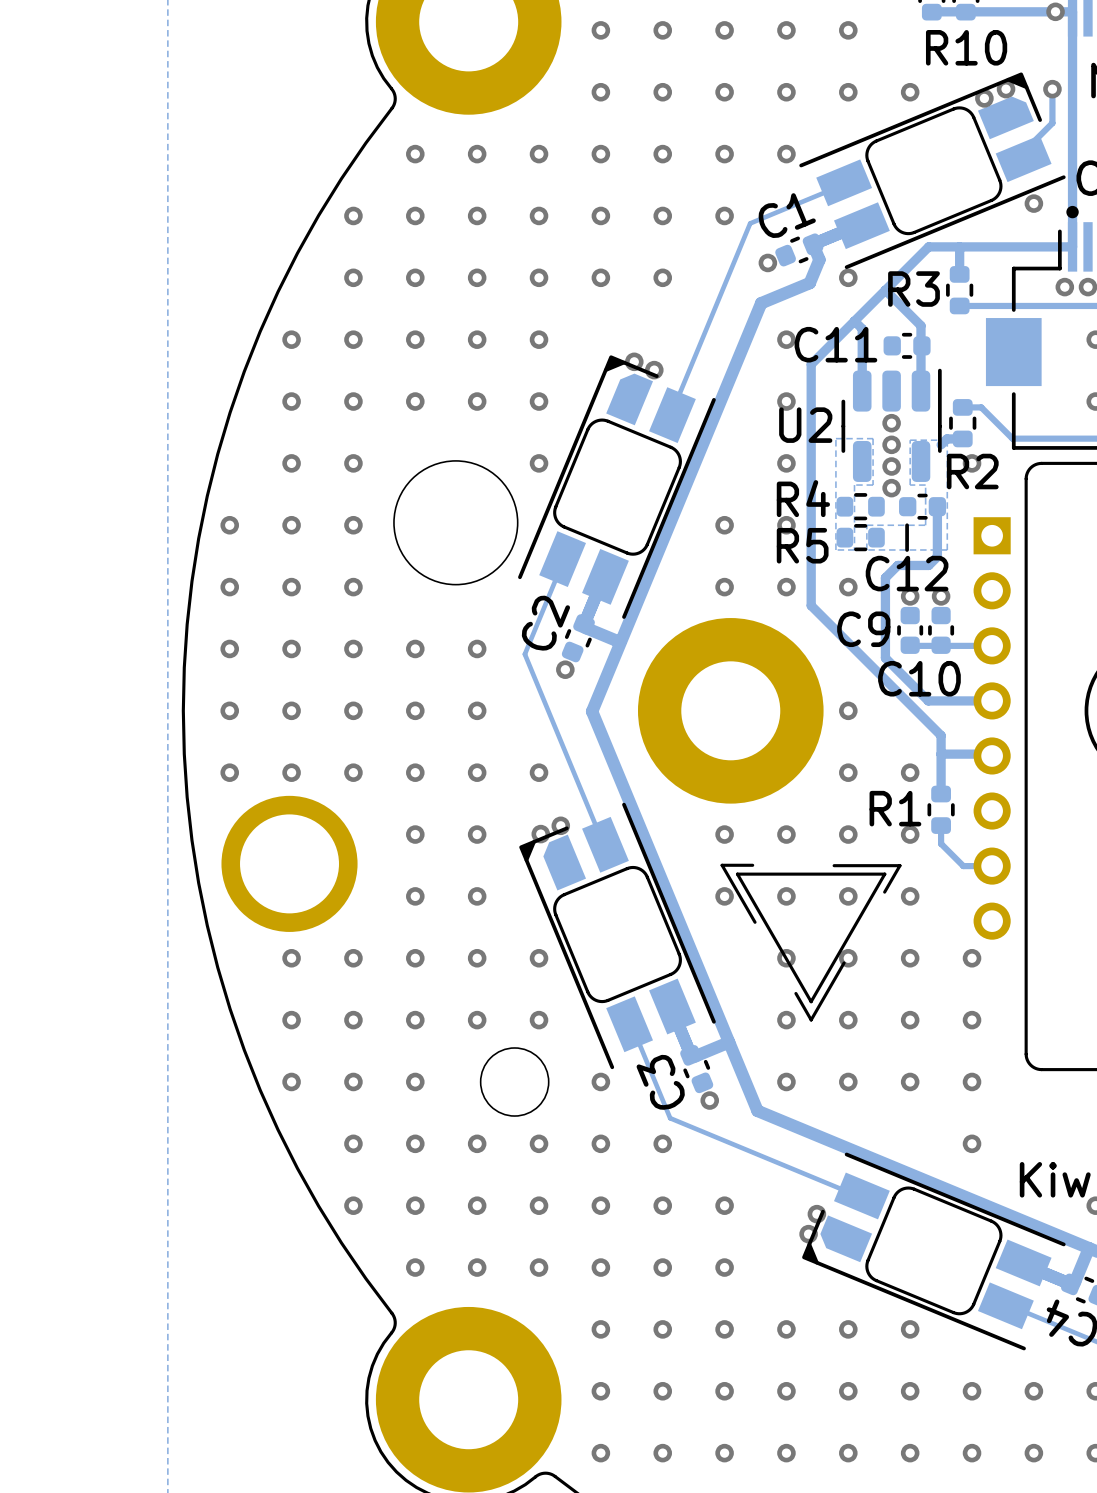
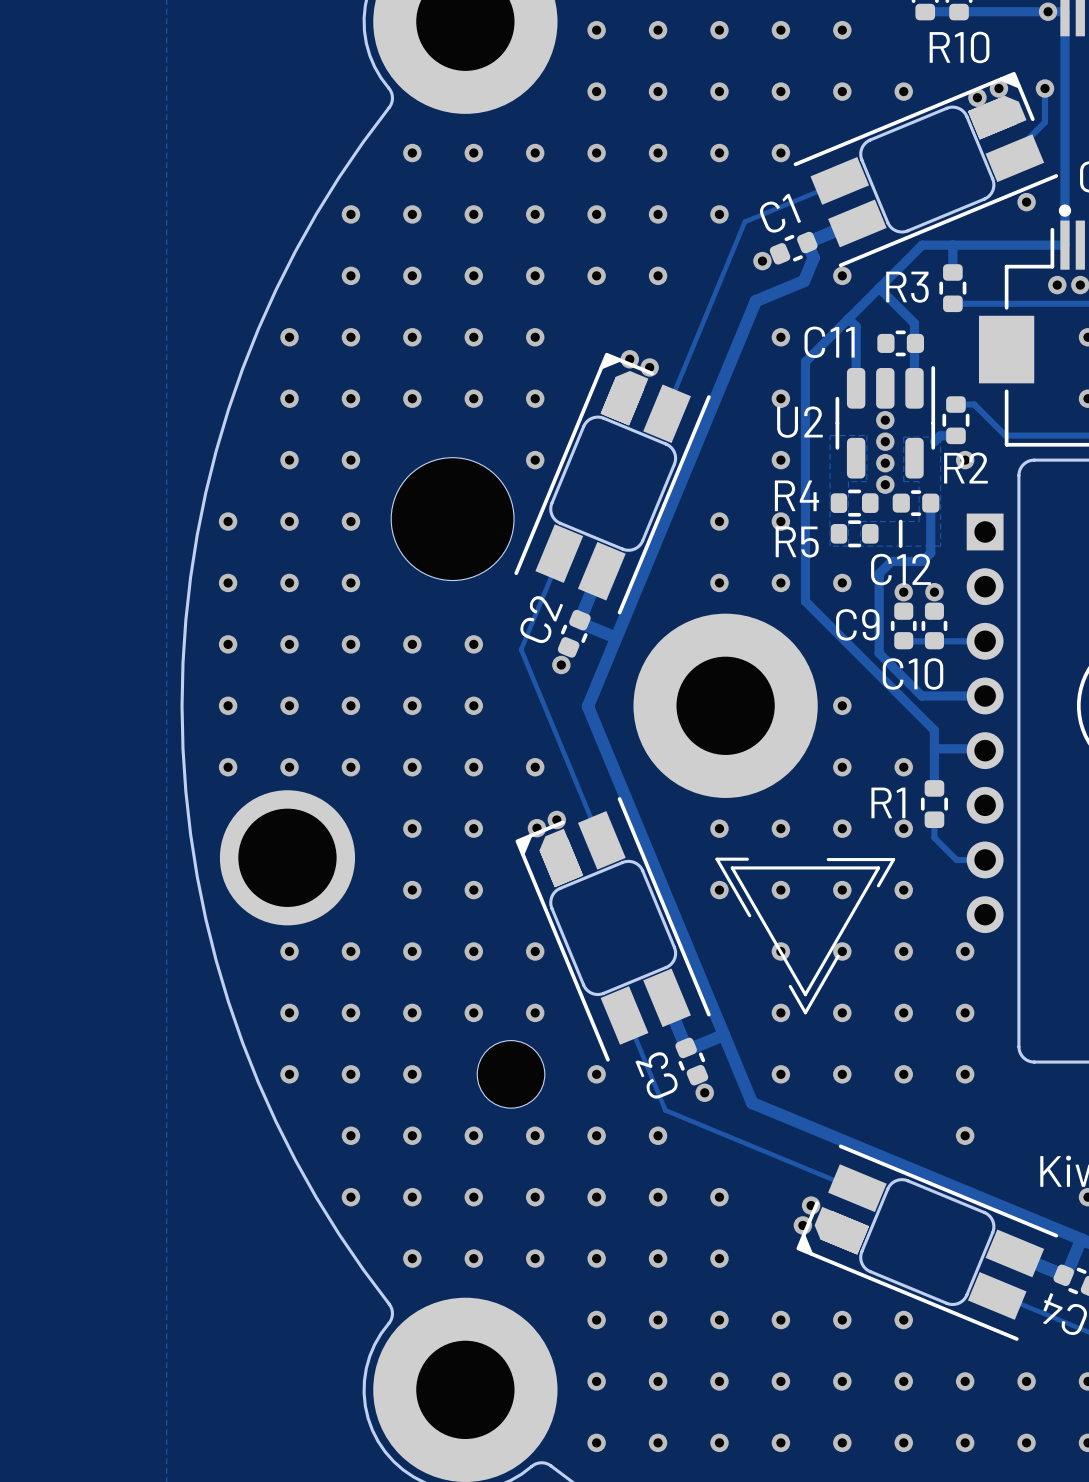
part footprint: [799, 72, 1066, 270] -> [793, 71, 1059, 268]
part footprint: [518, 355, 716, 619] -> [514, 352, 711, 615]
part footprint: [519, 802, 716, 1070] -> [515, 797, 711, 1062]
part footprint: [802, 1152, 1066, 1351] -> [796, 1144, 1059, 1341]

